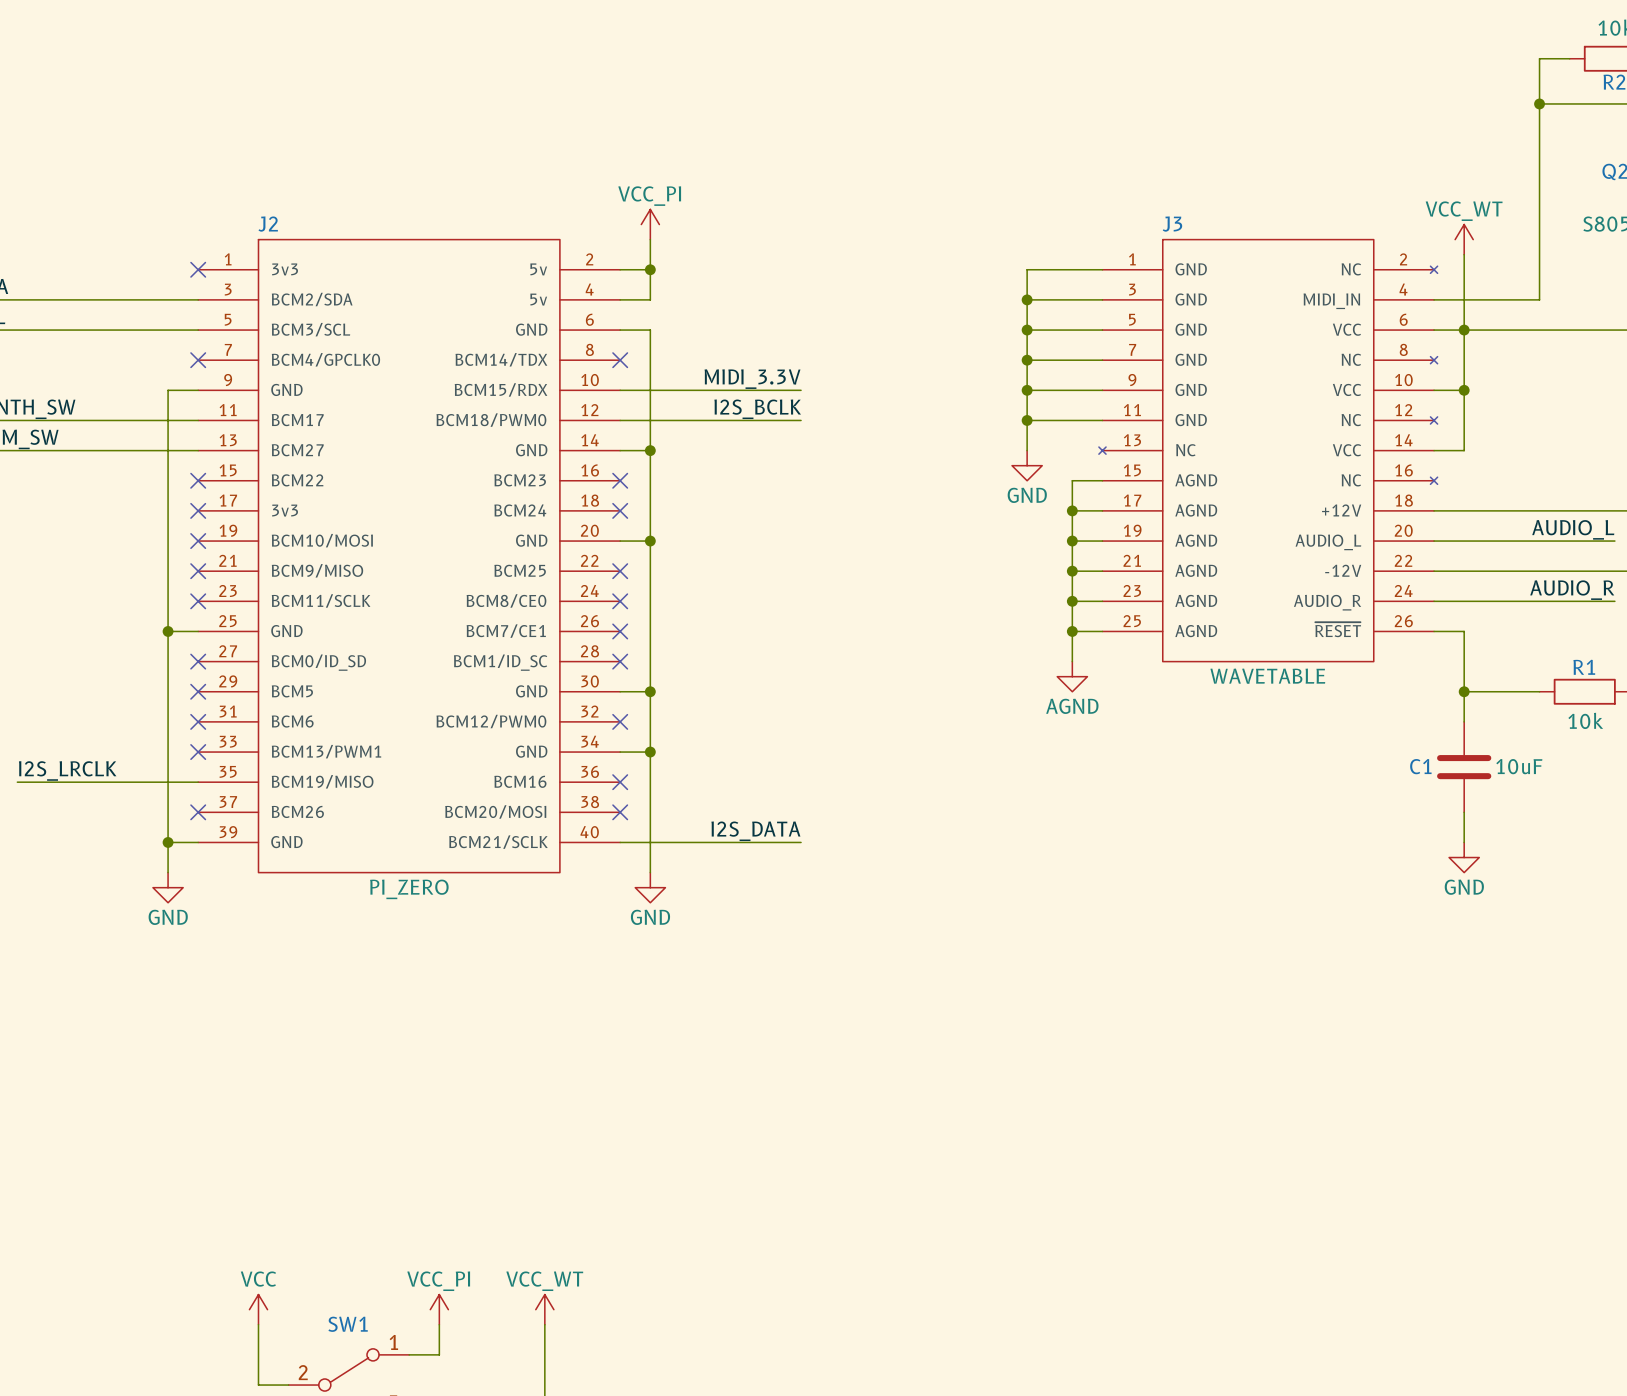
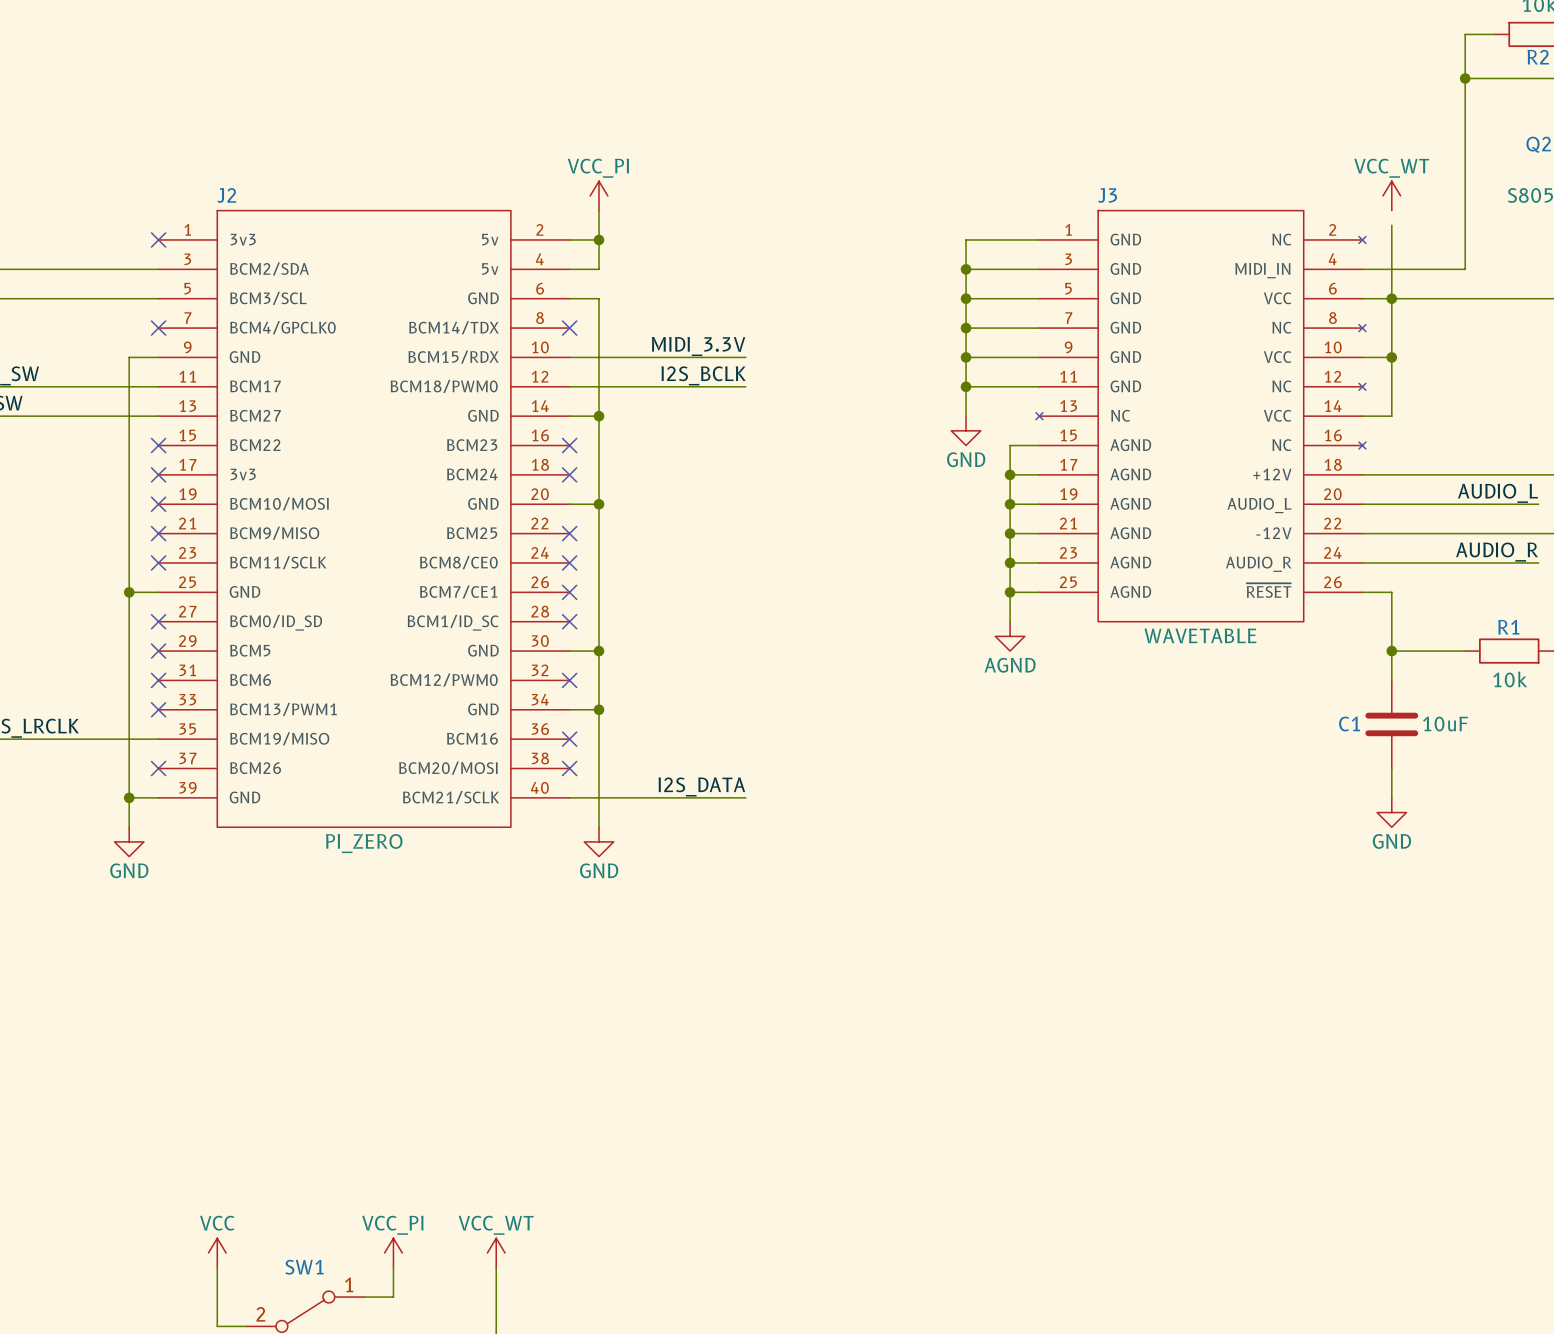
power symbol position: VCC_WT (1464, 239) -> VCC_WT (1391, 195)

